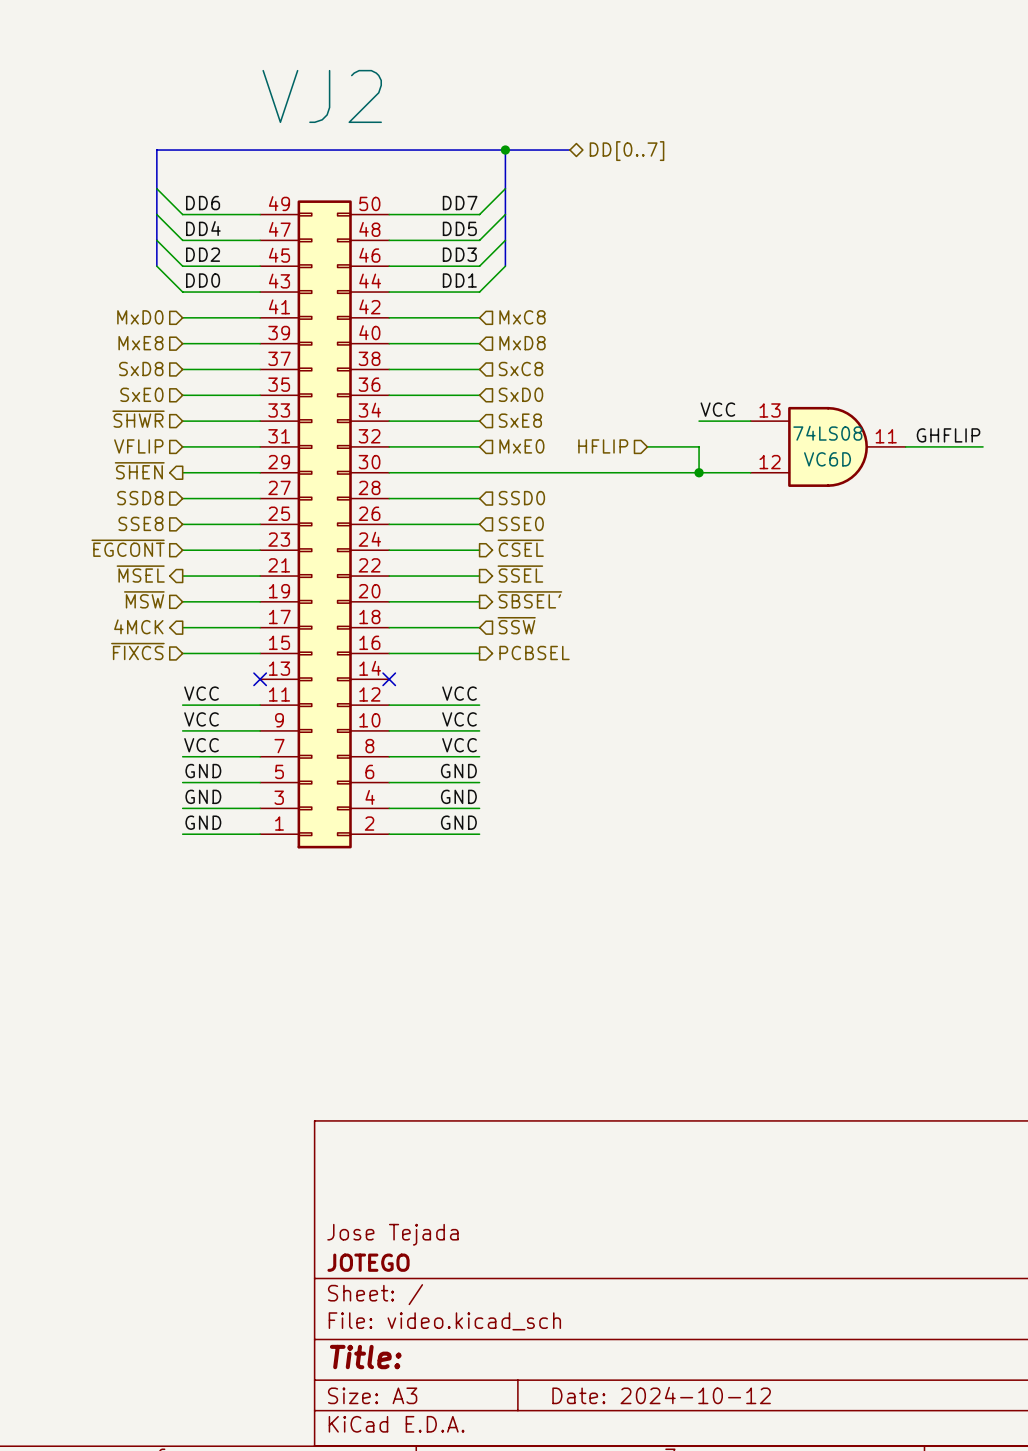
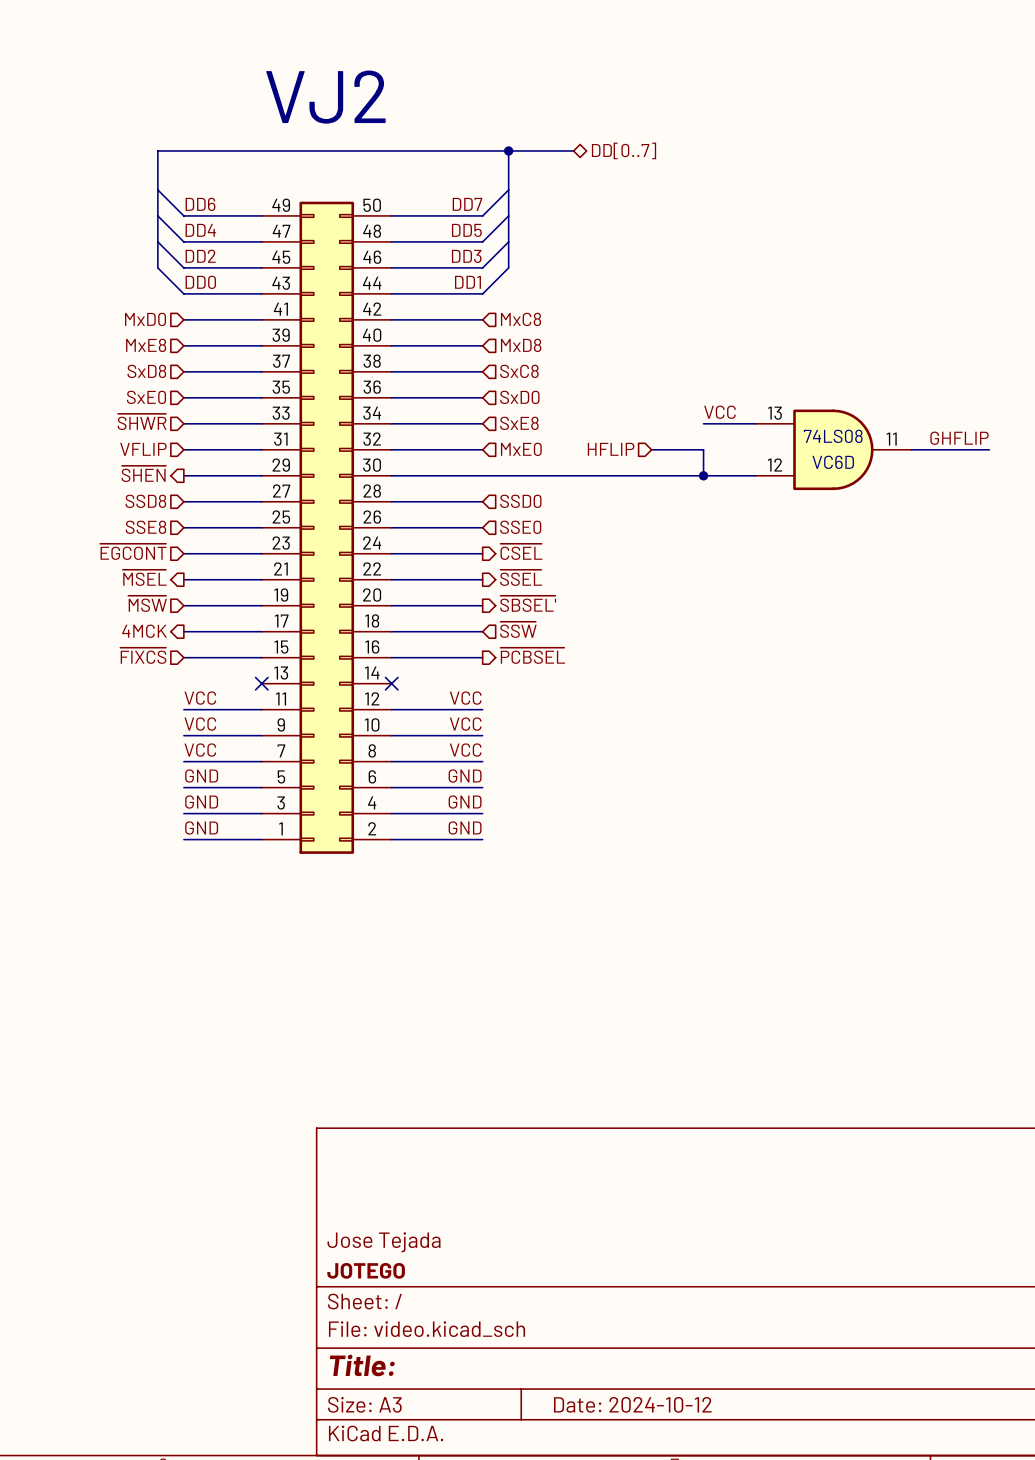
hierarchical label: PCBSEL (534, 652) -> ~{PCBSEL} (532, 655)

